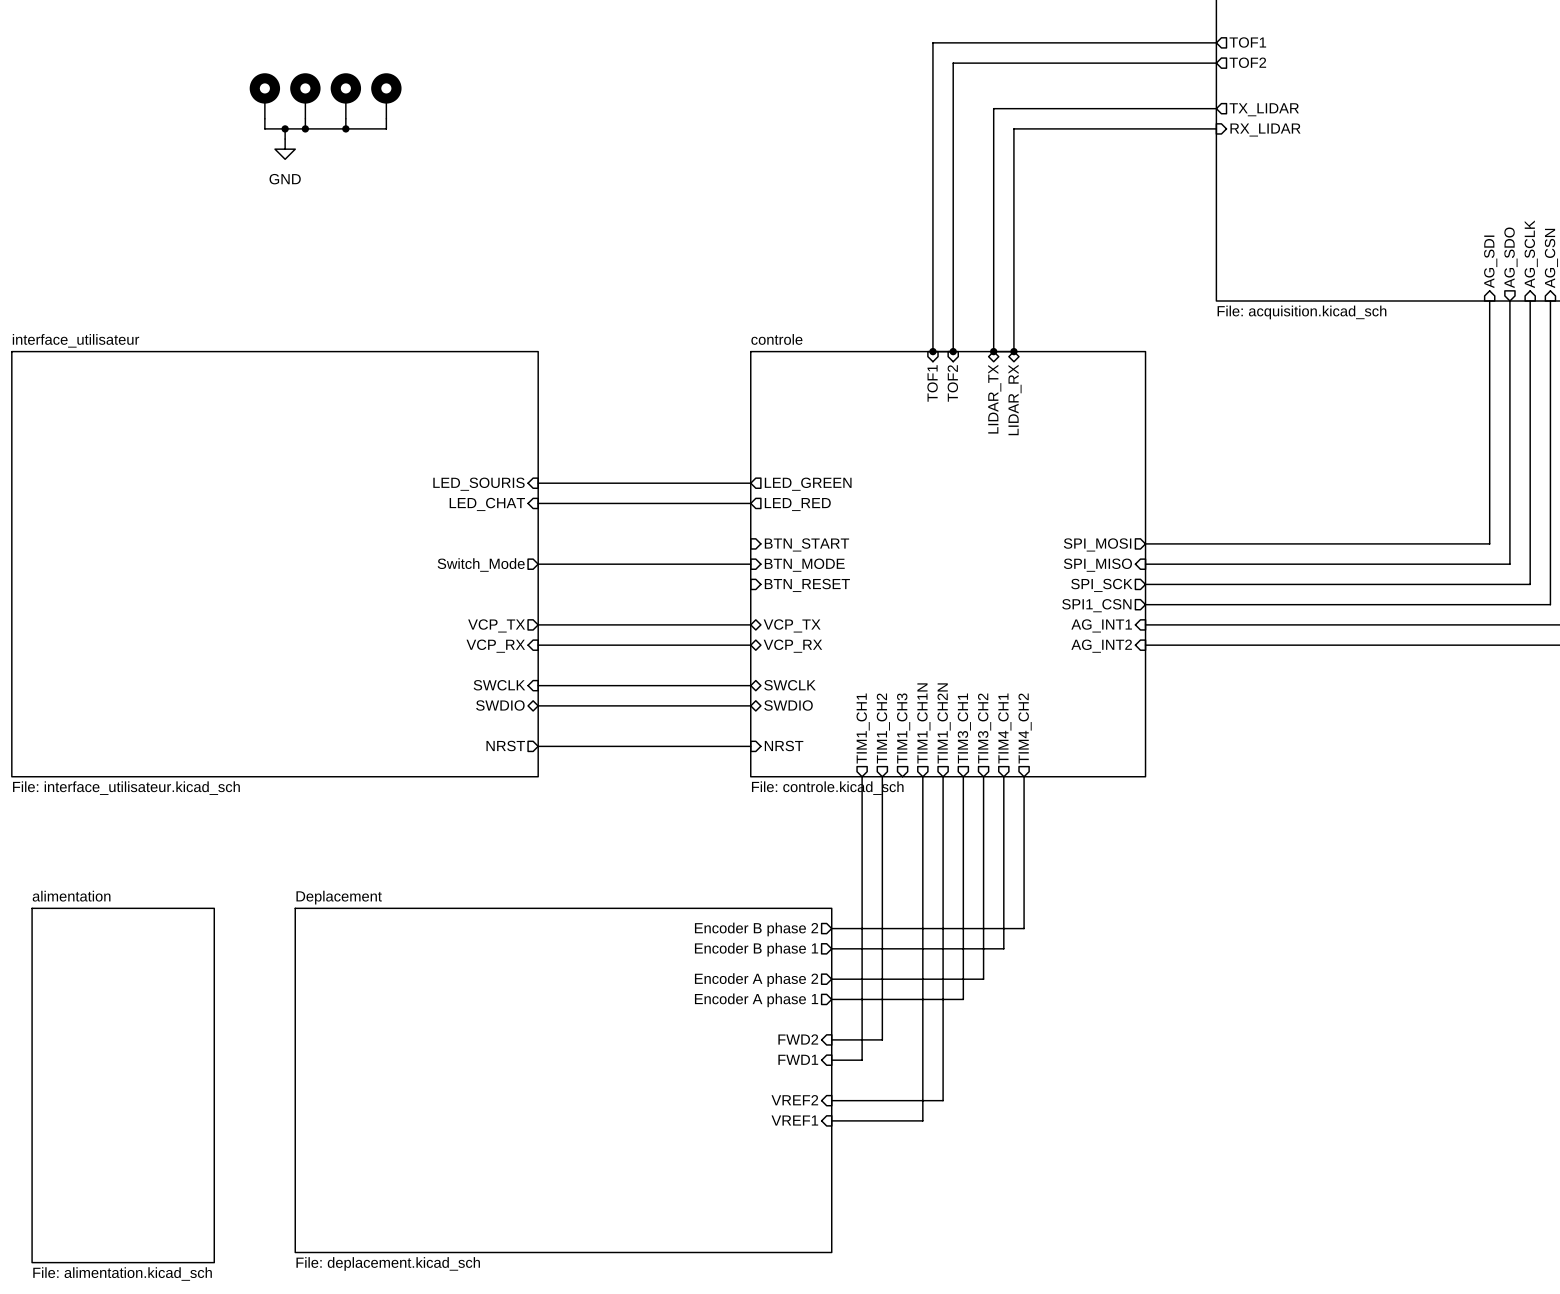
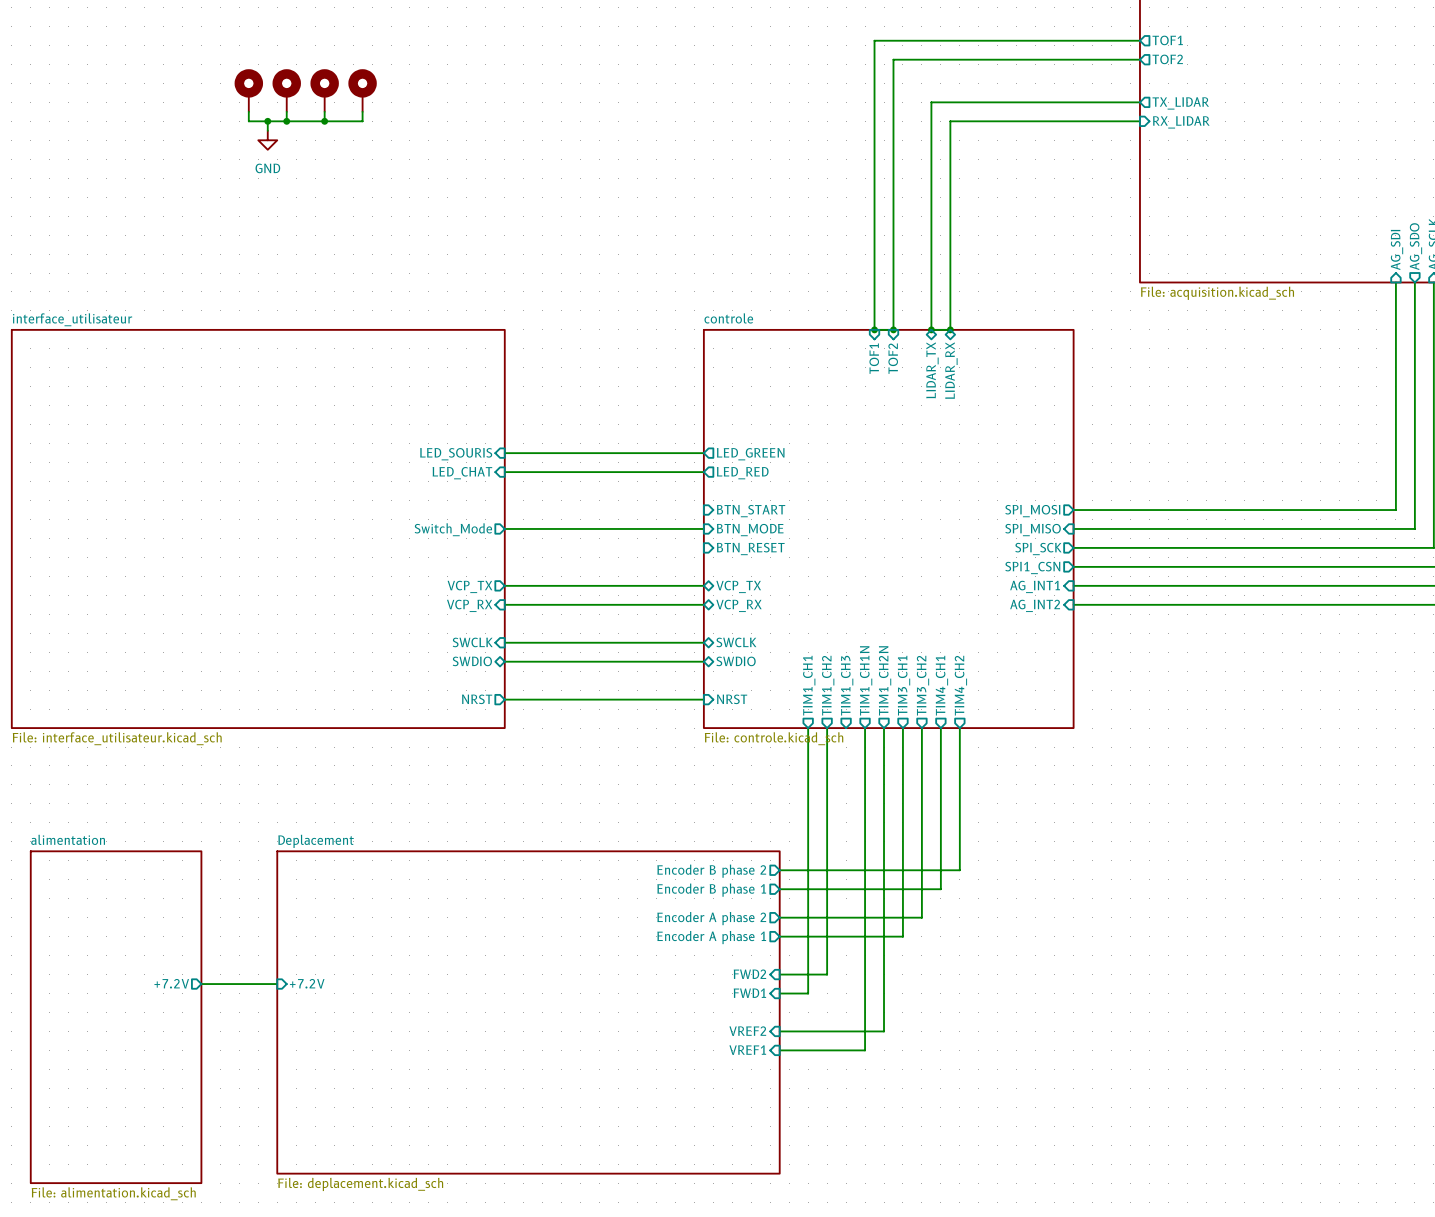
sheet pin: none -> +7.2V (171, 983)
sheet pin: none -> +7.2V (307, 983)
wire: none -> (201, 984) (277, 984)

